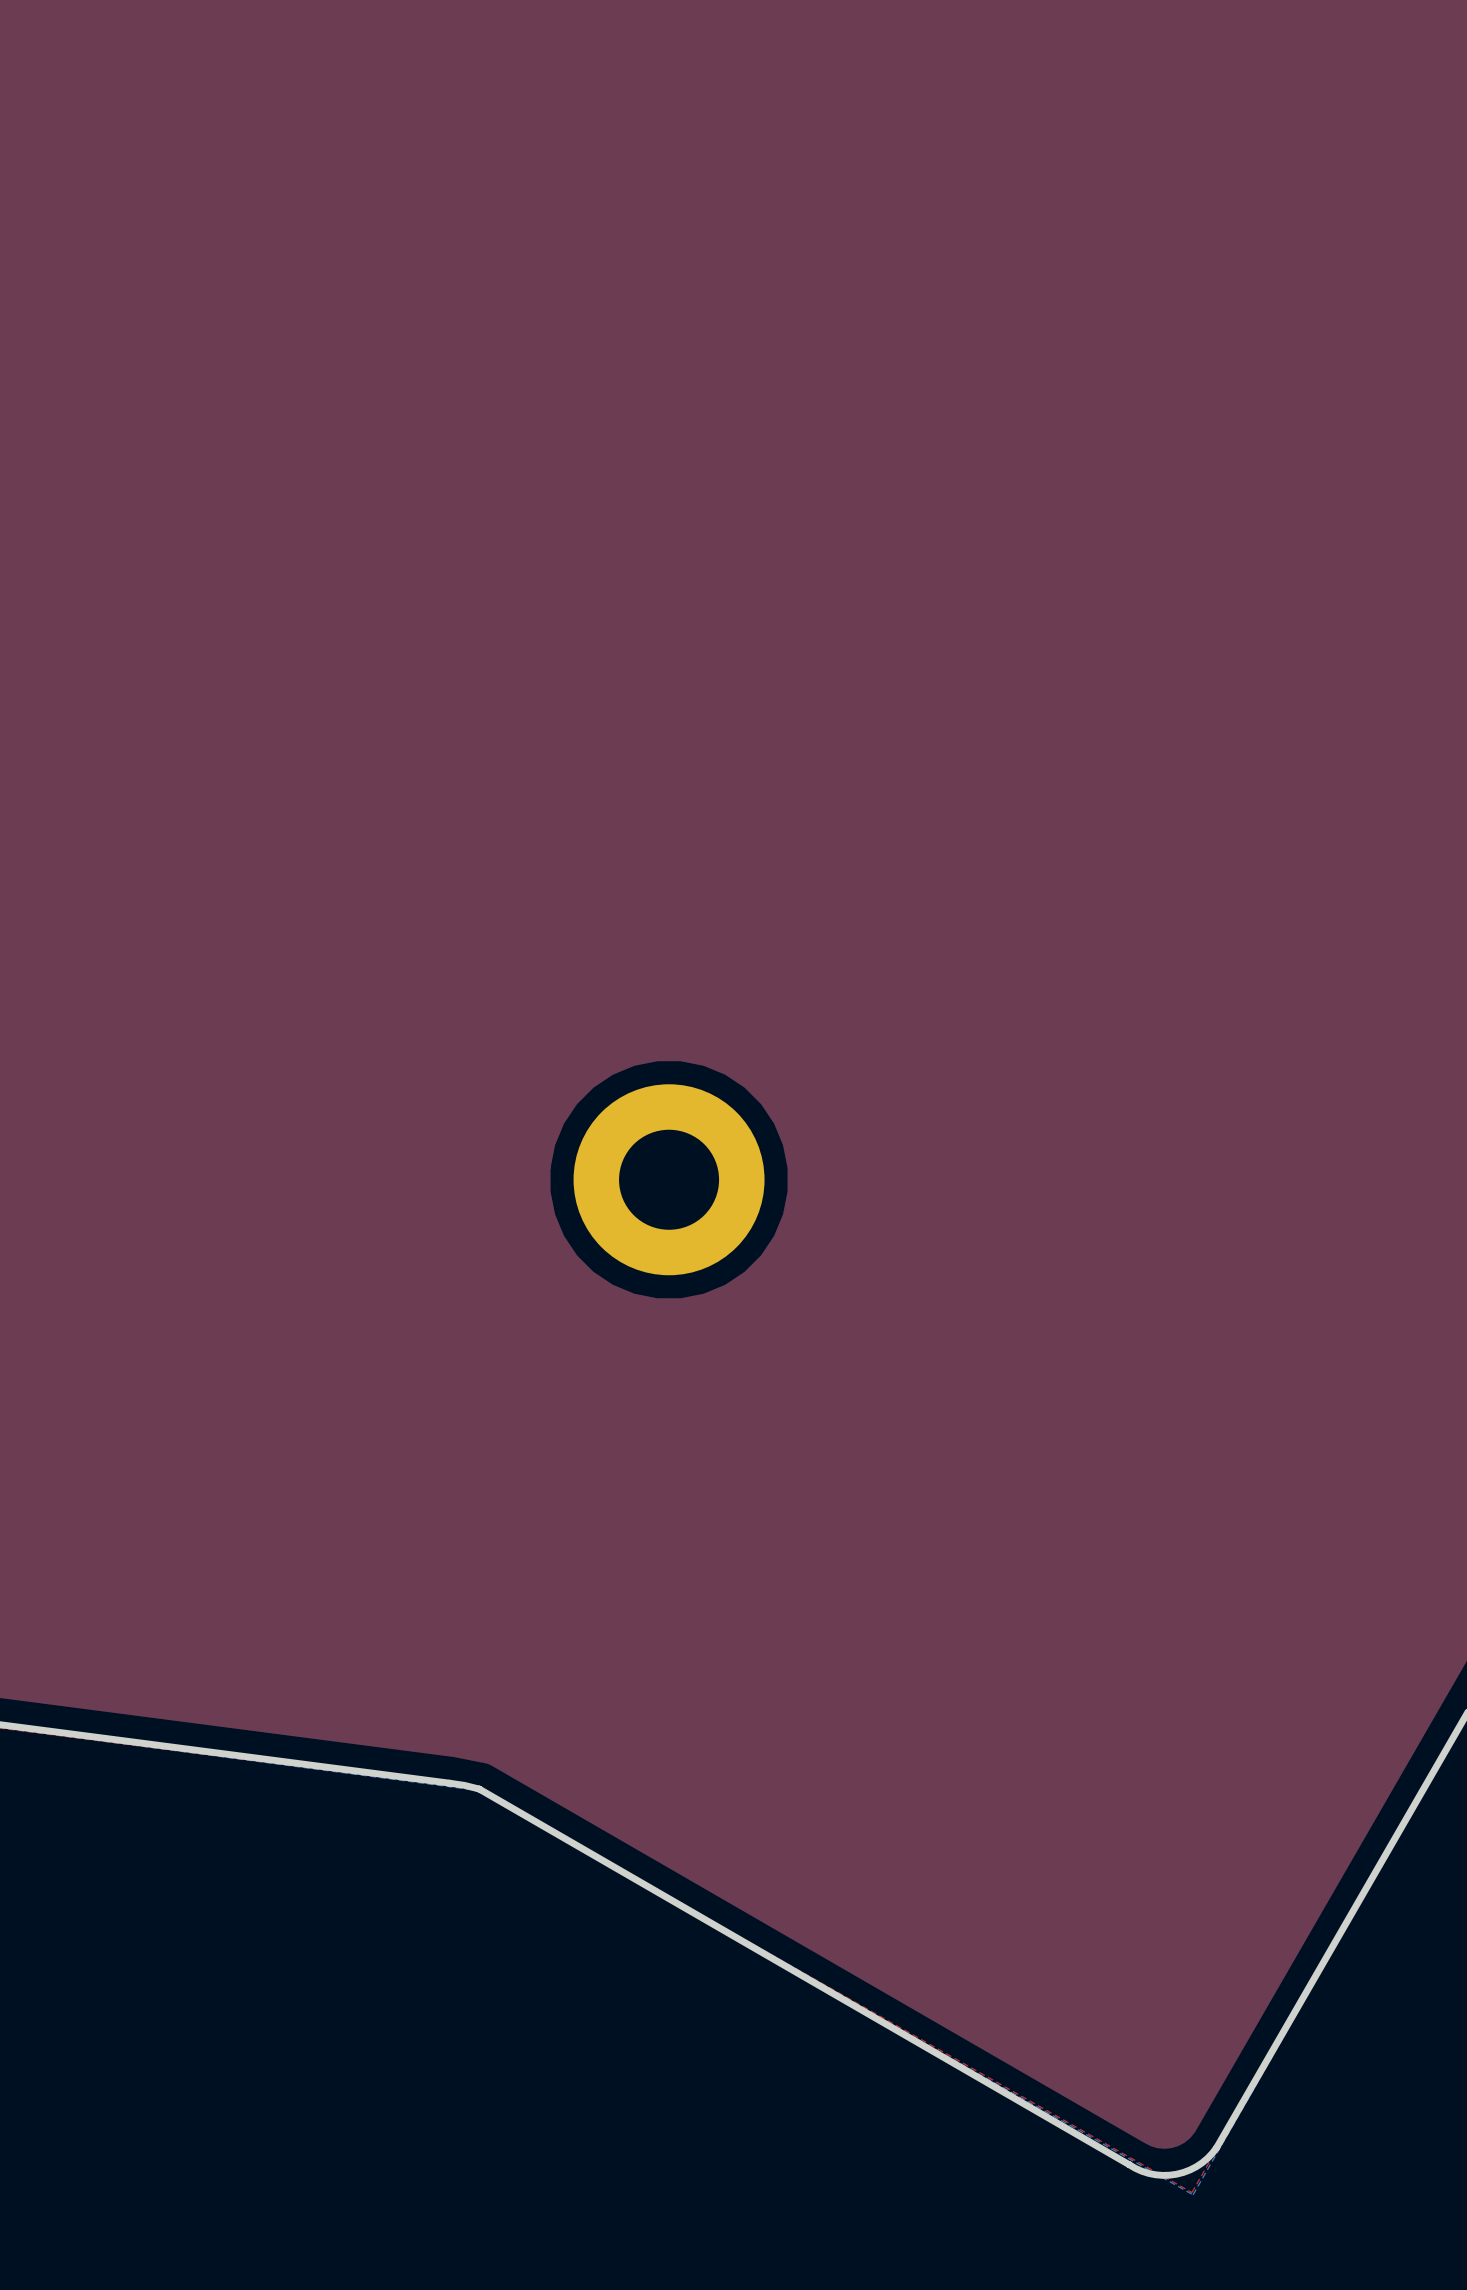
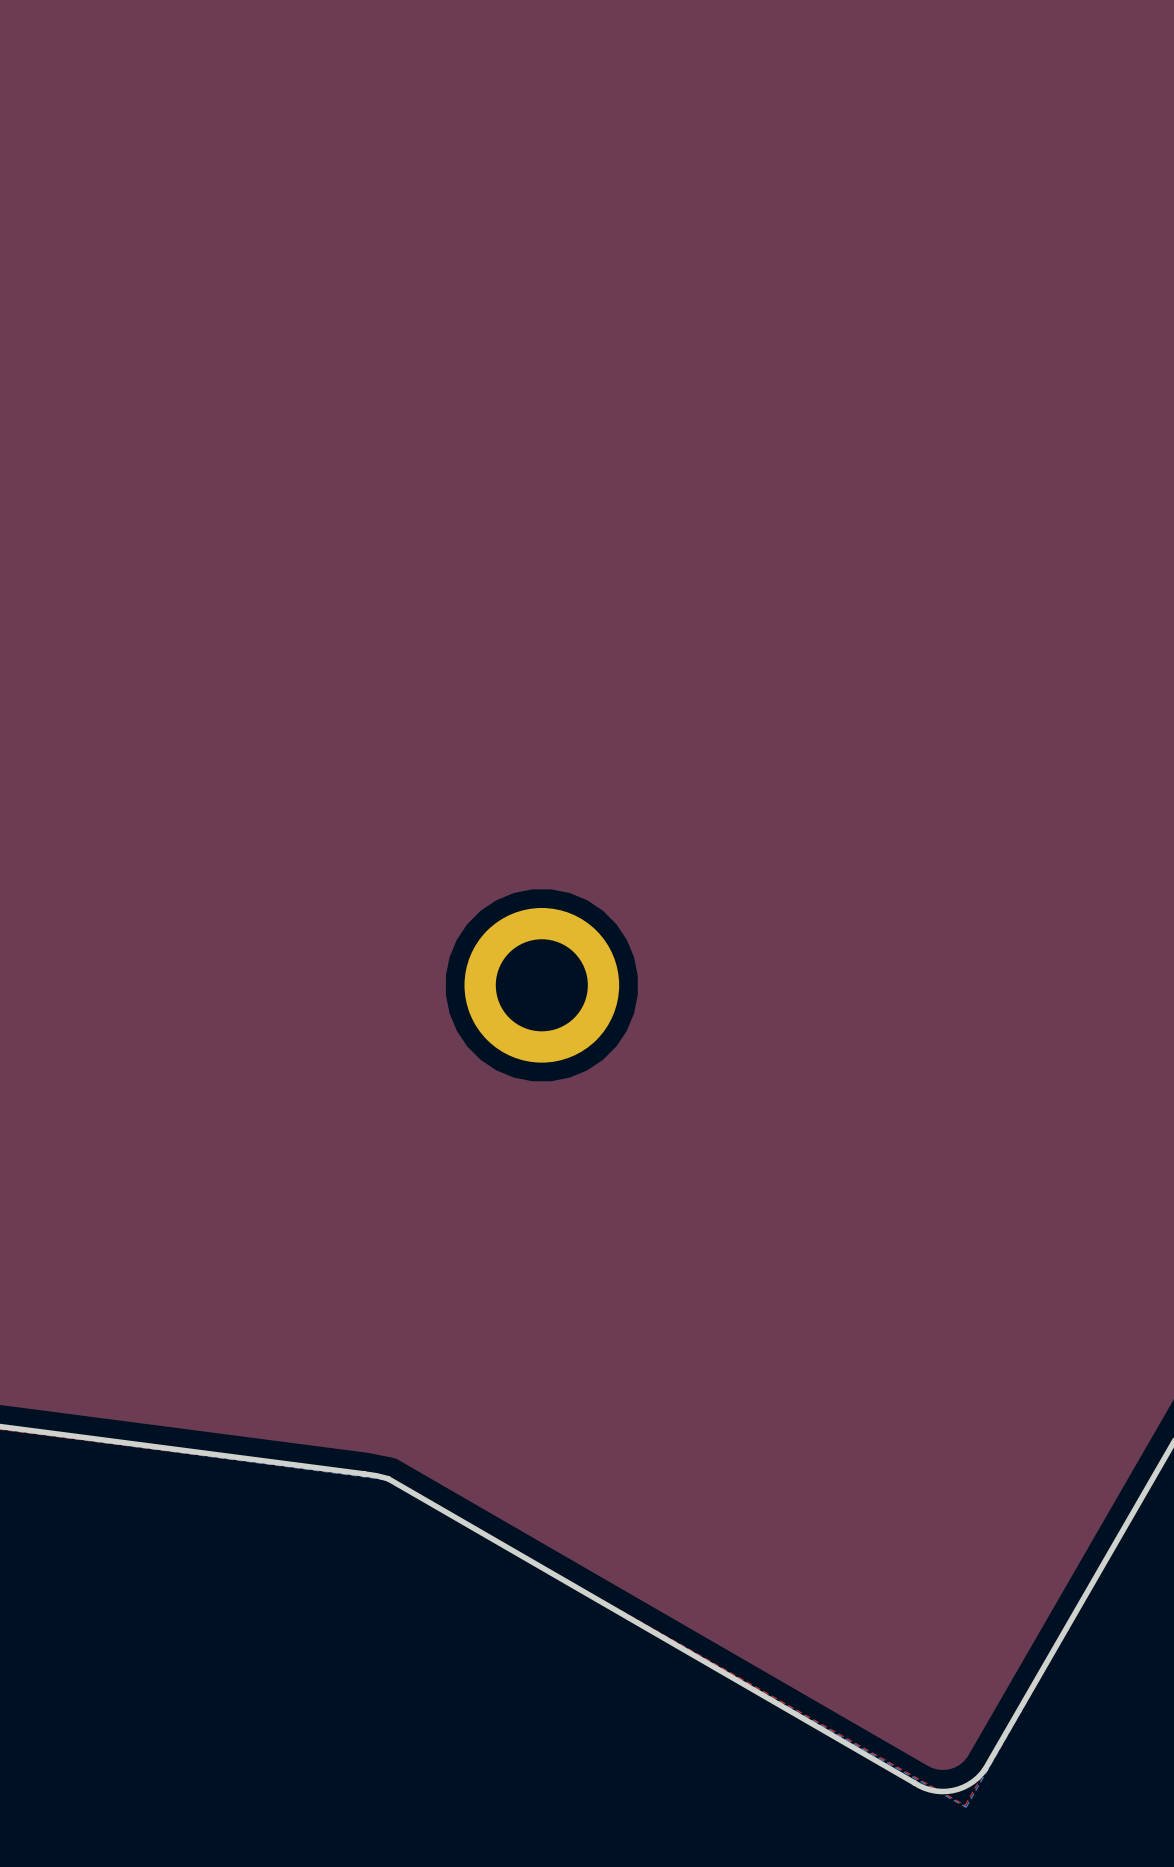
part footprint: [573, 1084, 765, 1276] -> [464, 907, 620, 1063]

